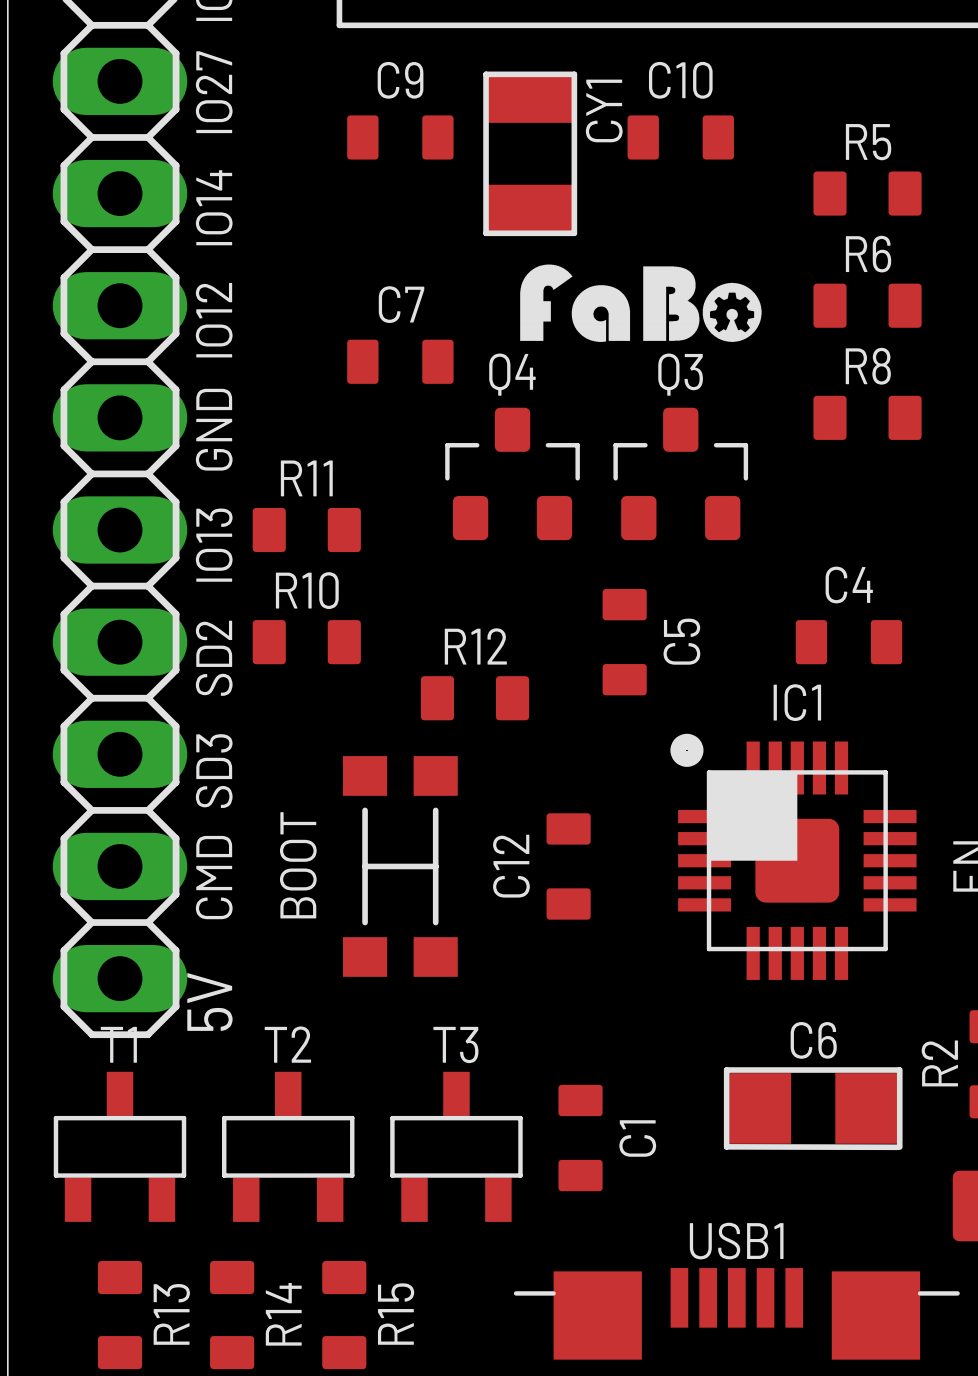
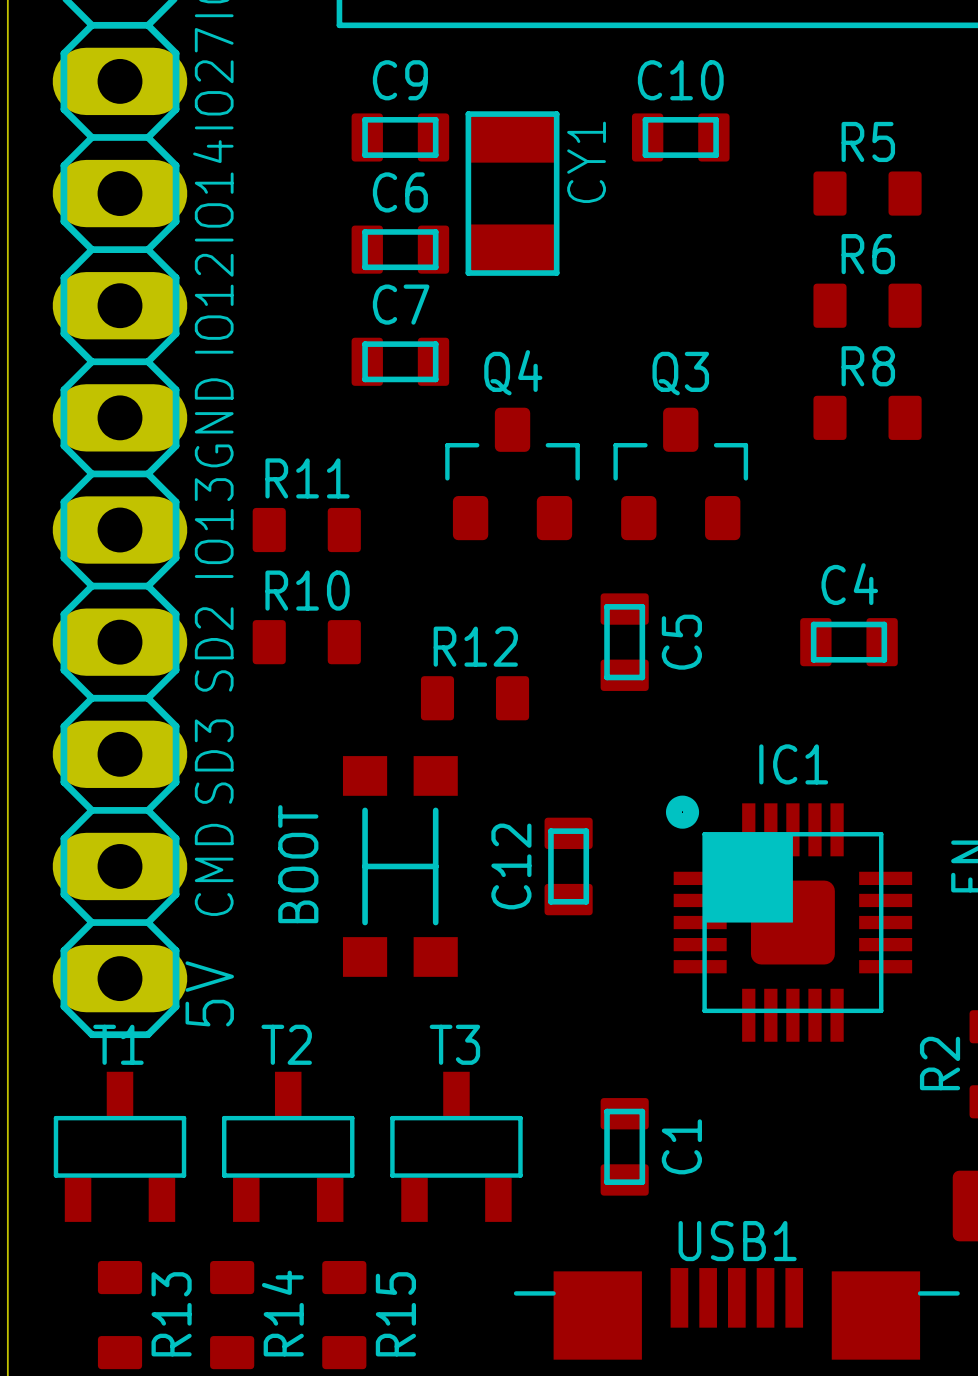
C9 footprint: [347, 115, 454, 160] -> [351, 113, 450, 162]
C10 footprint: [627, 115, 734, 160] -> [631, 113, 730, 162]
CY1 position: (530, 153) -> (512, 193)
drawing: [520, 264, 762, 342] -> none
C7 footprint: [347, 339, 454, 384] -> [351, 337, 450, 386]
C5 footprint: [602, 588, 647, 696] -> [600, 593, 649, 691]
C4 footprint: [795, 620, 903, 665] -> [800, 618, 898, 667]
C12 footprint: [546, 813, 591, 920] -> [544, 817, 593, 916]
IC1 position: (793, 856) -> (789, 918)
C6 footprint: [723, 1067, 903, 1151] -> [351, 225, 450, 274]
C1 footprint: [558, 1084, 603, 1192] -> [600, 1098, 649, 1196]

